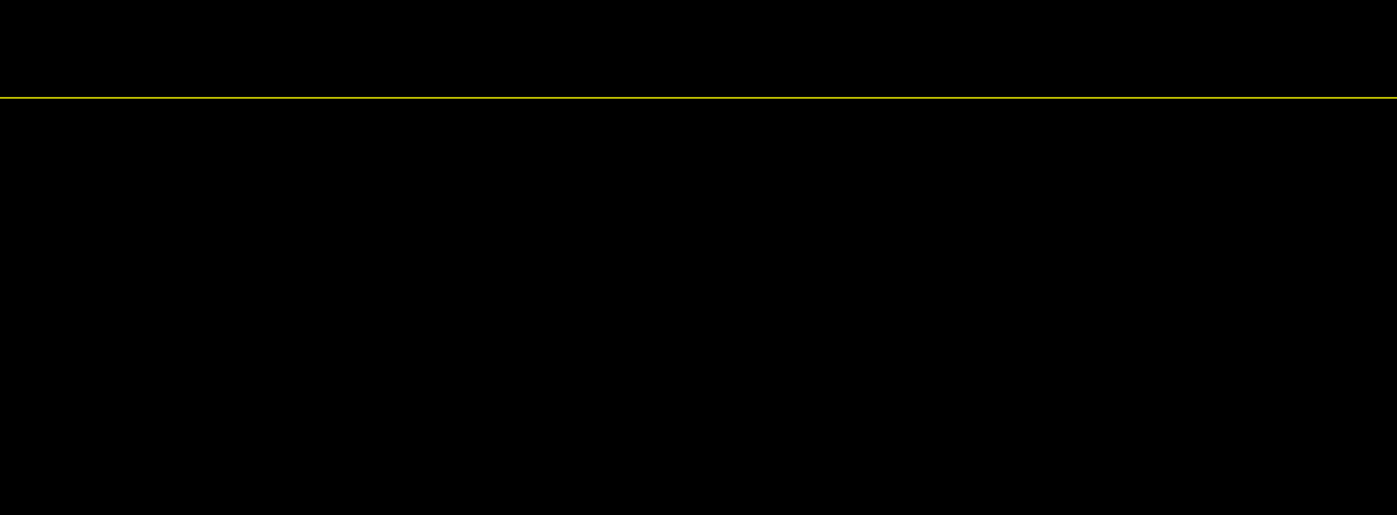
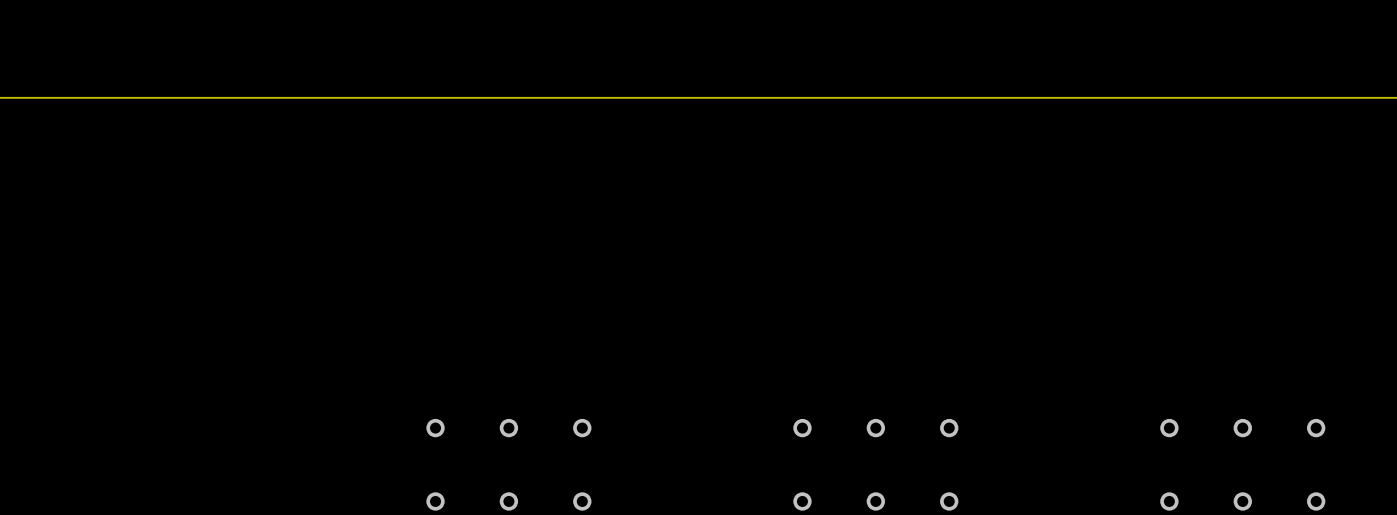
via: none -> (435, 428)
via: none -> (508, 428)
via: none -> (582, 428)
via: none -> (802, 428)
via: none -> (875, 428)
via: none -> (949, 428)
via: none -> (1169, 428)
via: none -> (1242, 428)
via: none -> (1316, 428)
via: none -> (435, 501)
via: none -> (508, 501)
via: none -> (582, 501)
via: none -> (802, 501)
via: none -> (875, 501)
via: none -> (949, 501)
via: none -> (1169, 501)
via: none -> (1242, 501)
via: none -> (1316, 501)

